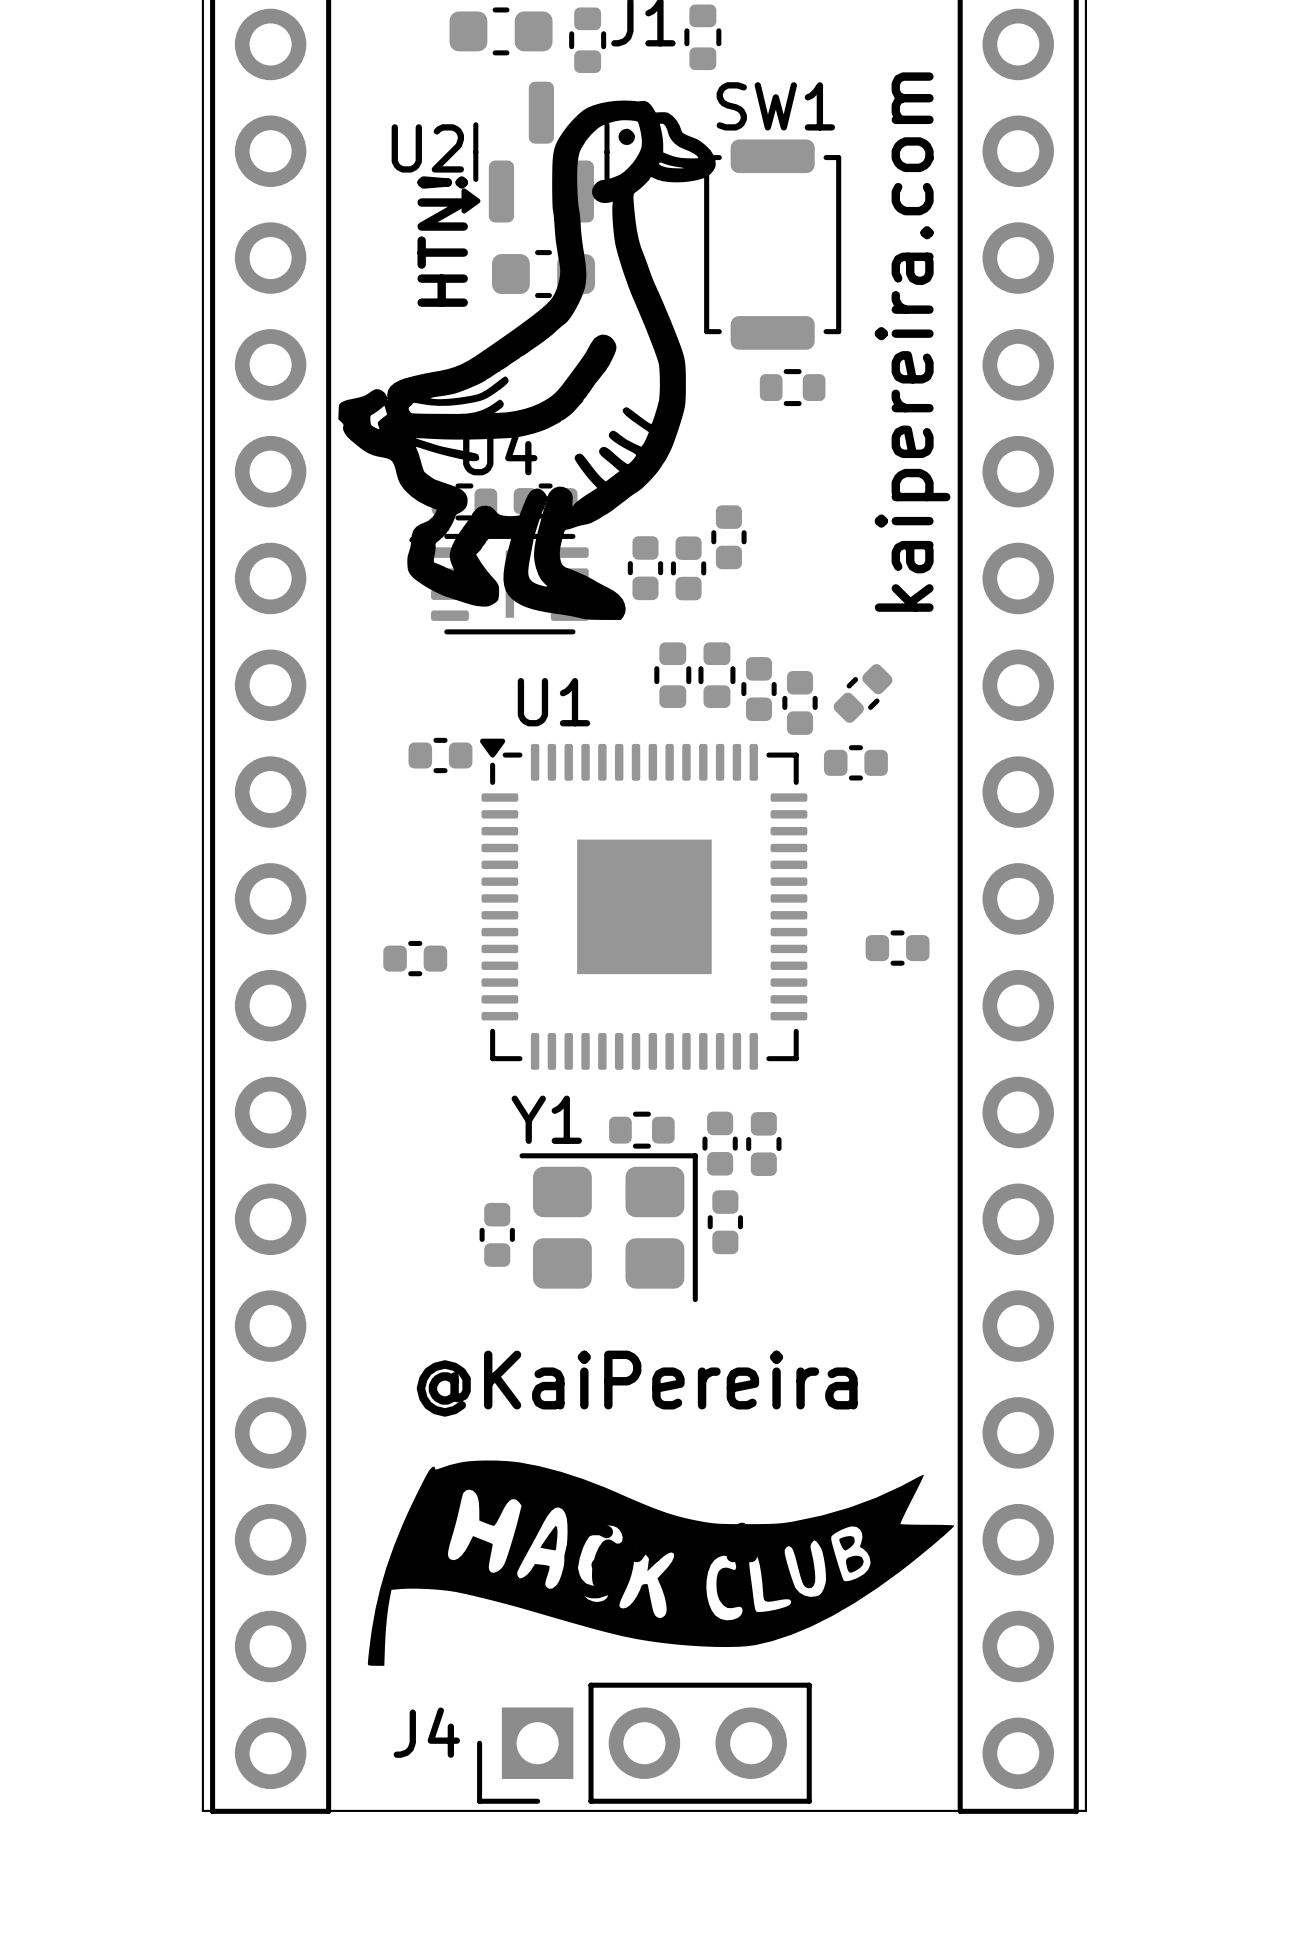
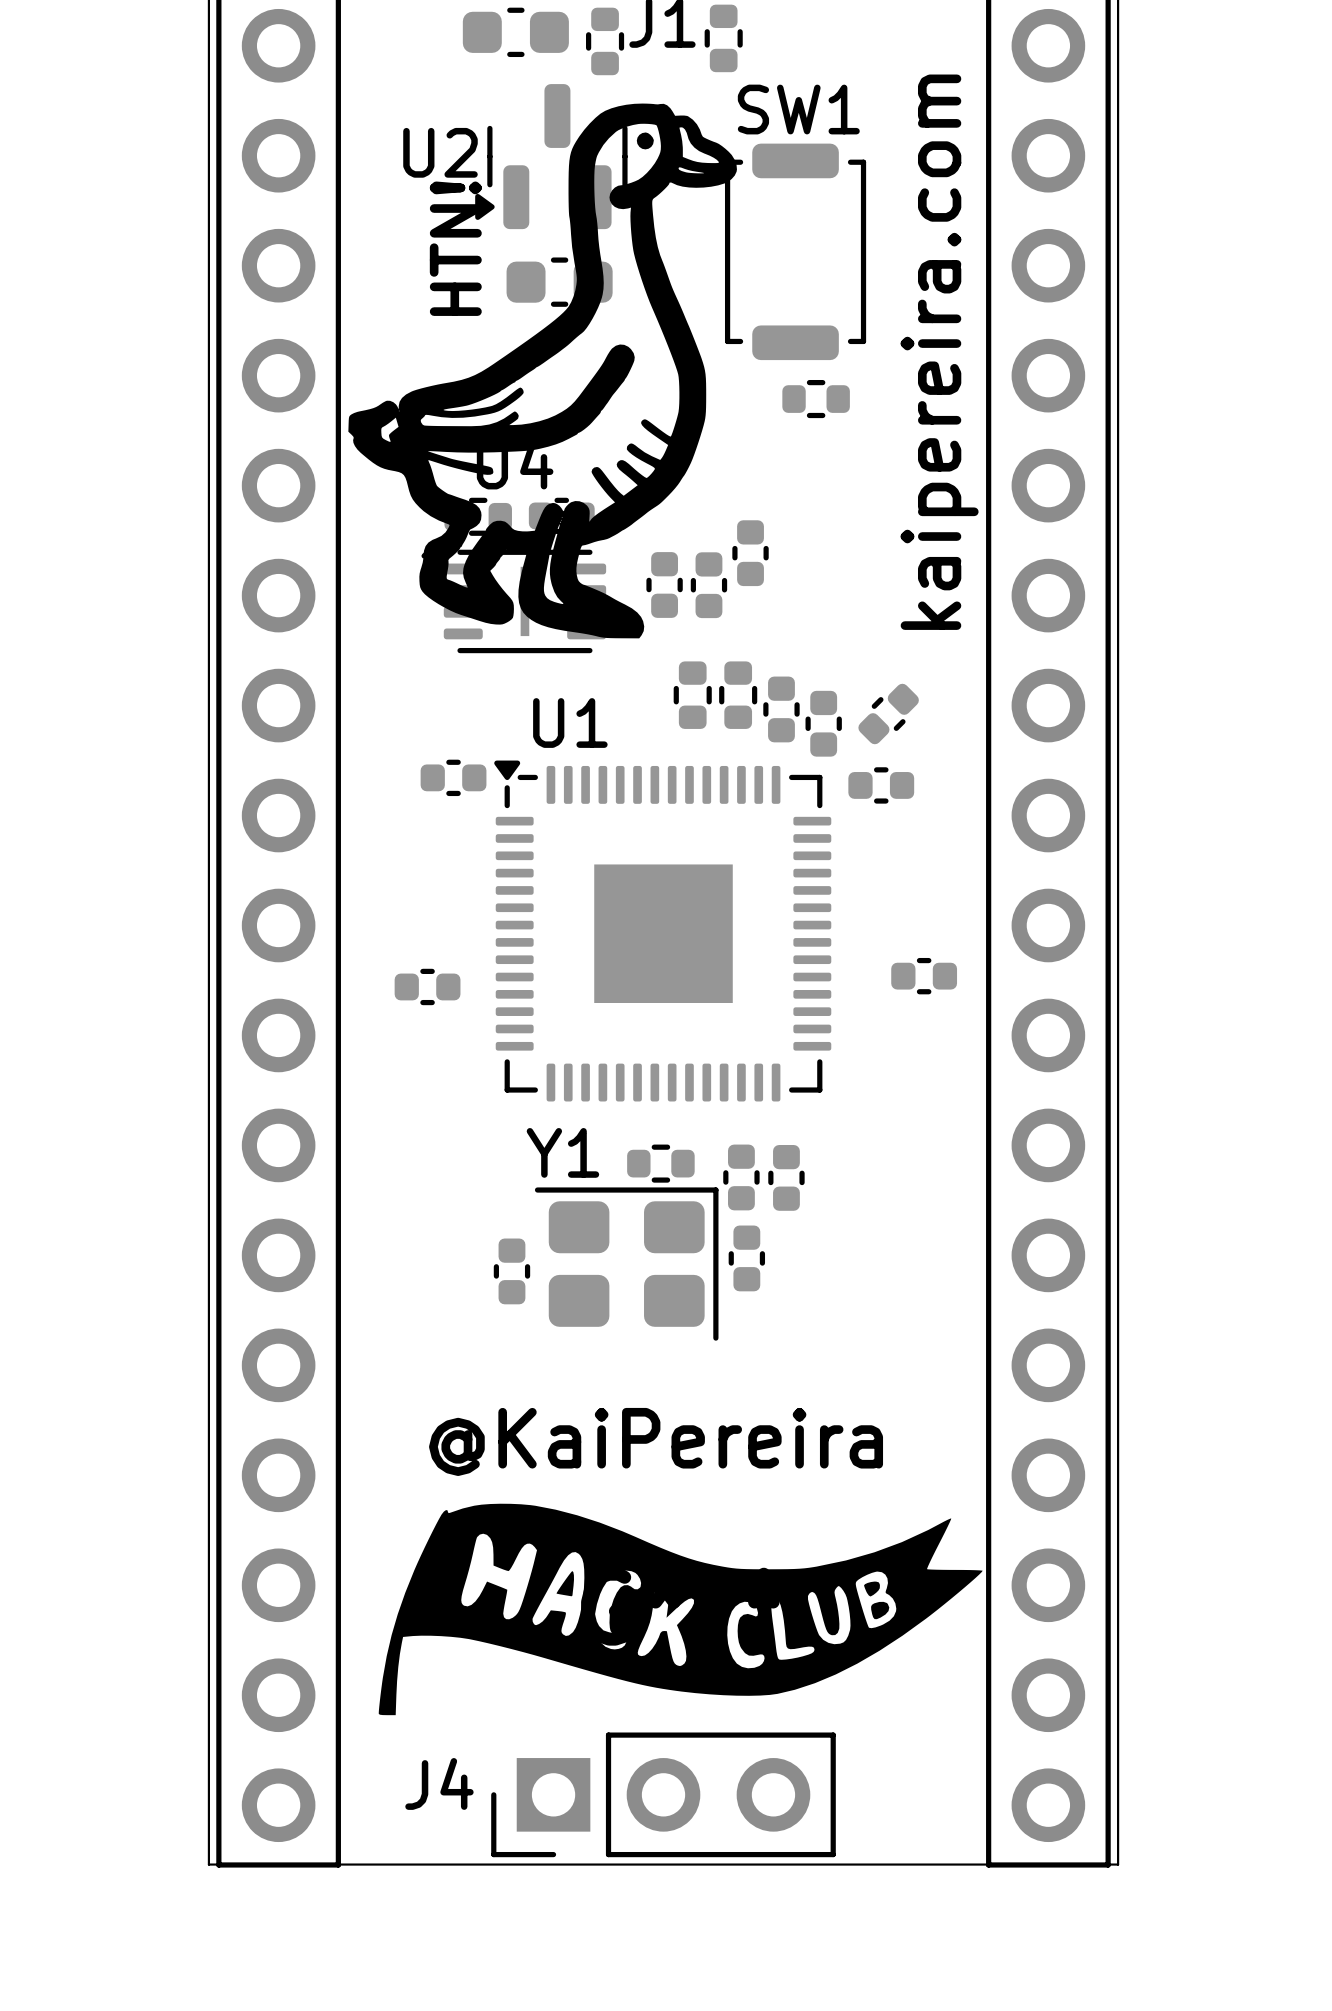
text position: @KaiPereira (637, 1383) -> @KaiPereira (656, 1441)

